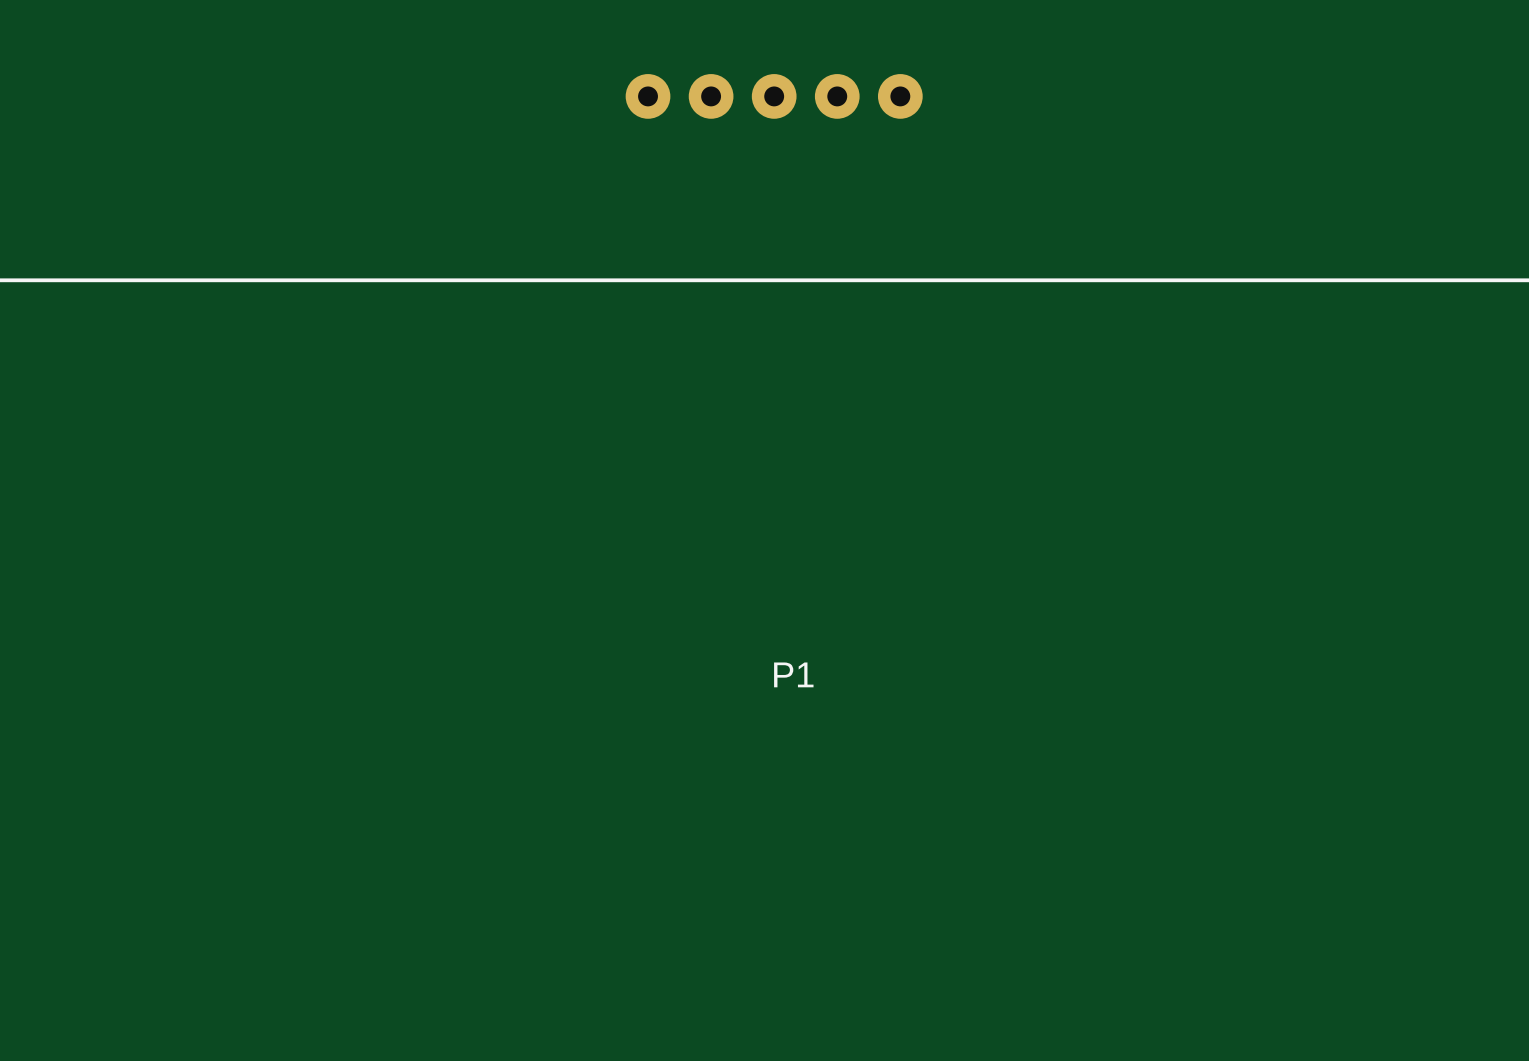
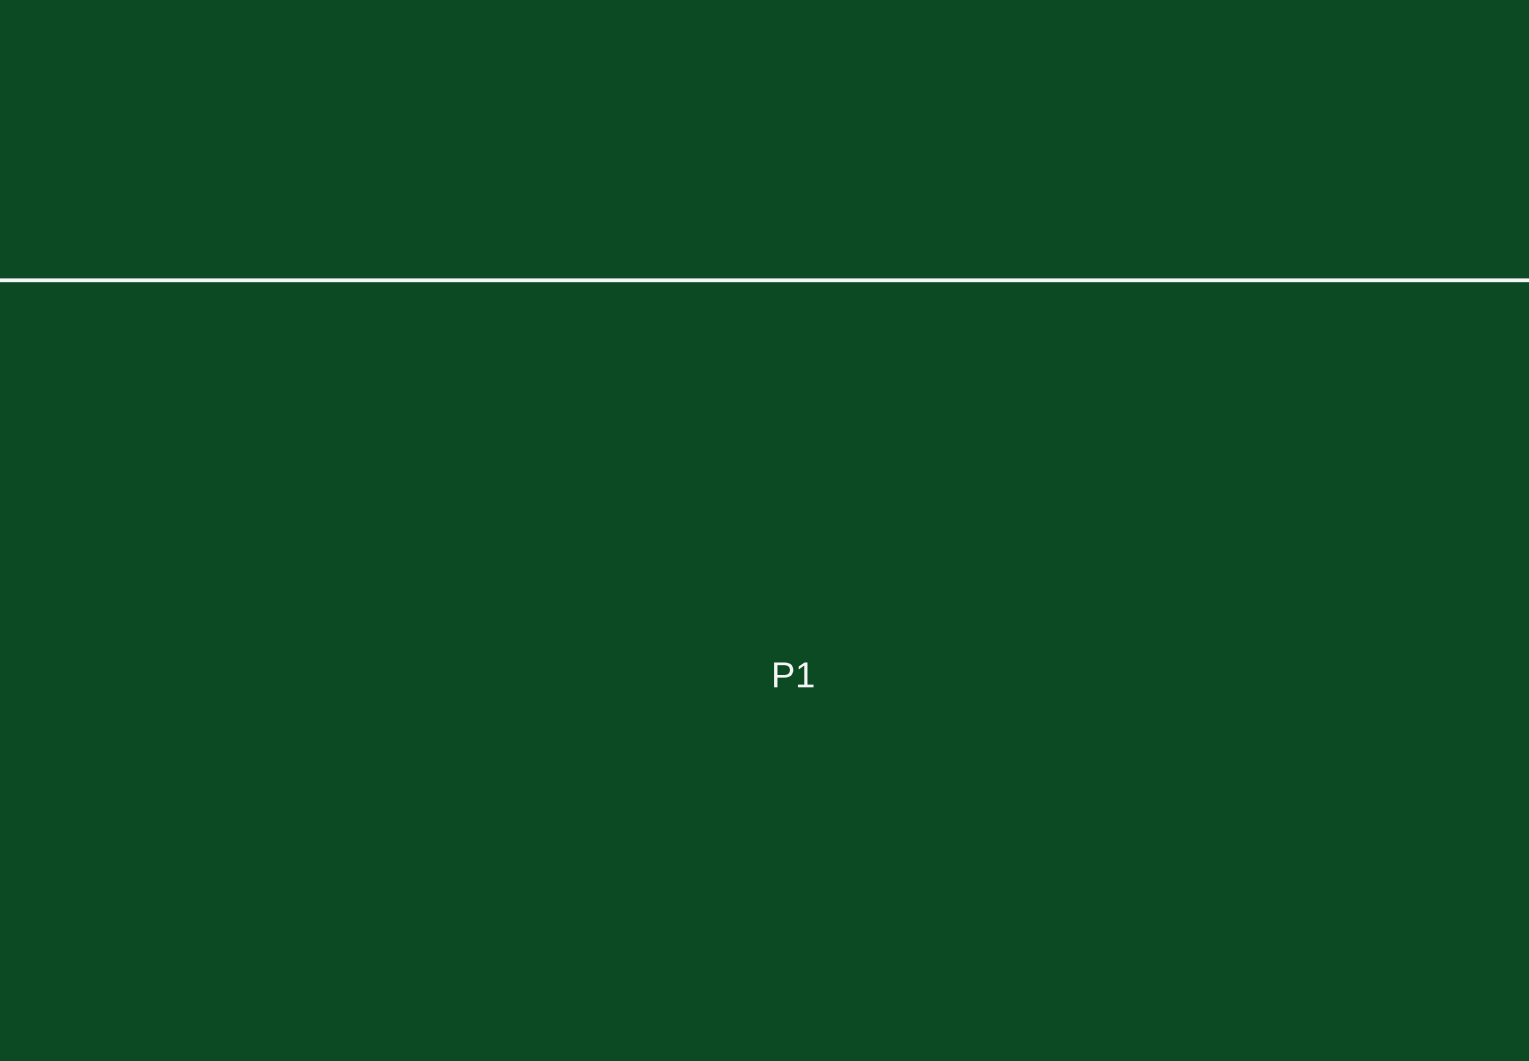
part: (774, 96) -> none

